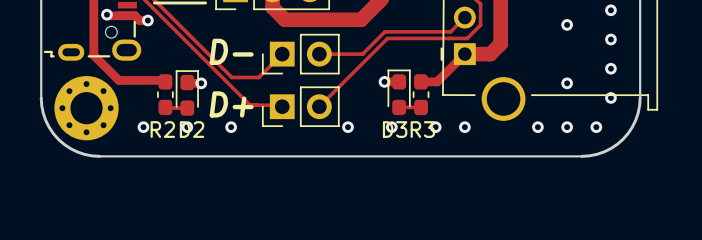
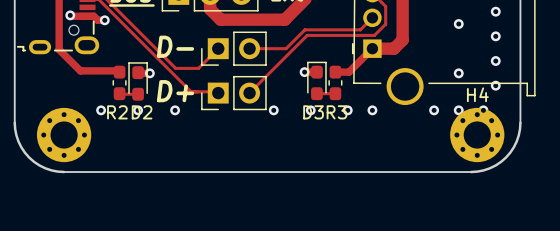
board edge: (41, 97) (45, 120) (58, 139) (77, 151) (99, 156) (589, 155) (610, 148) (628, 133) (638, 113) (640, 97) -> (14, 85) (15, 129) (21, 147) (29, 157) (39, 165) (51, 170) (64, 172) (477, 171) (489, 168) (501, 161) (513, 147) (520, 129) (520, 85)
part position: (86, 108) -> (64, 135)
H4: none -> (477, 135)

